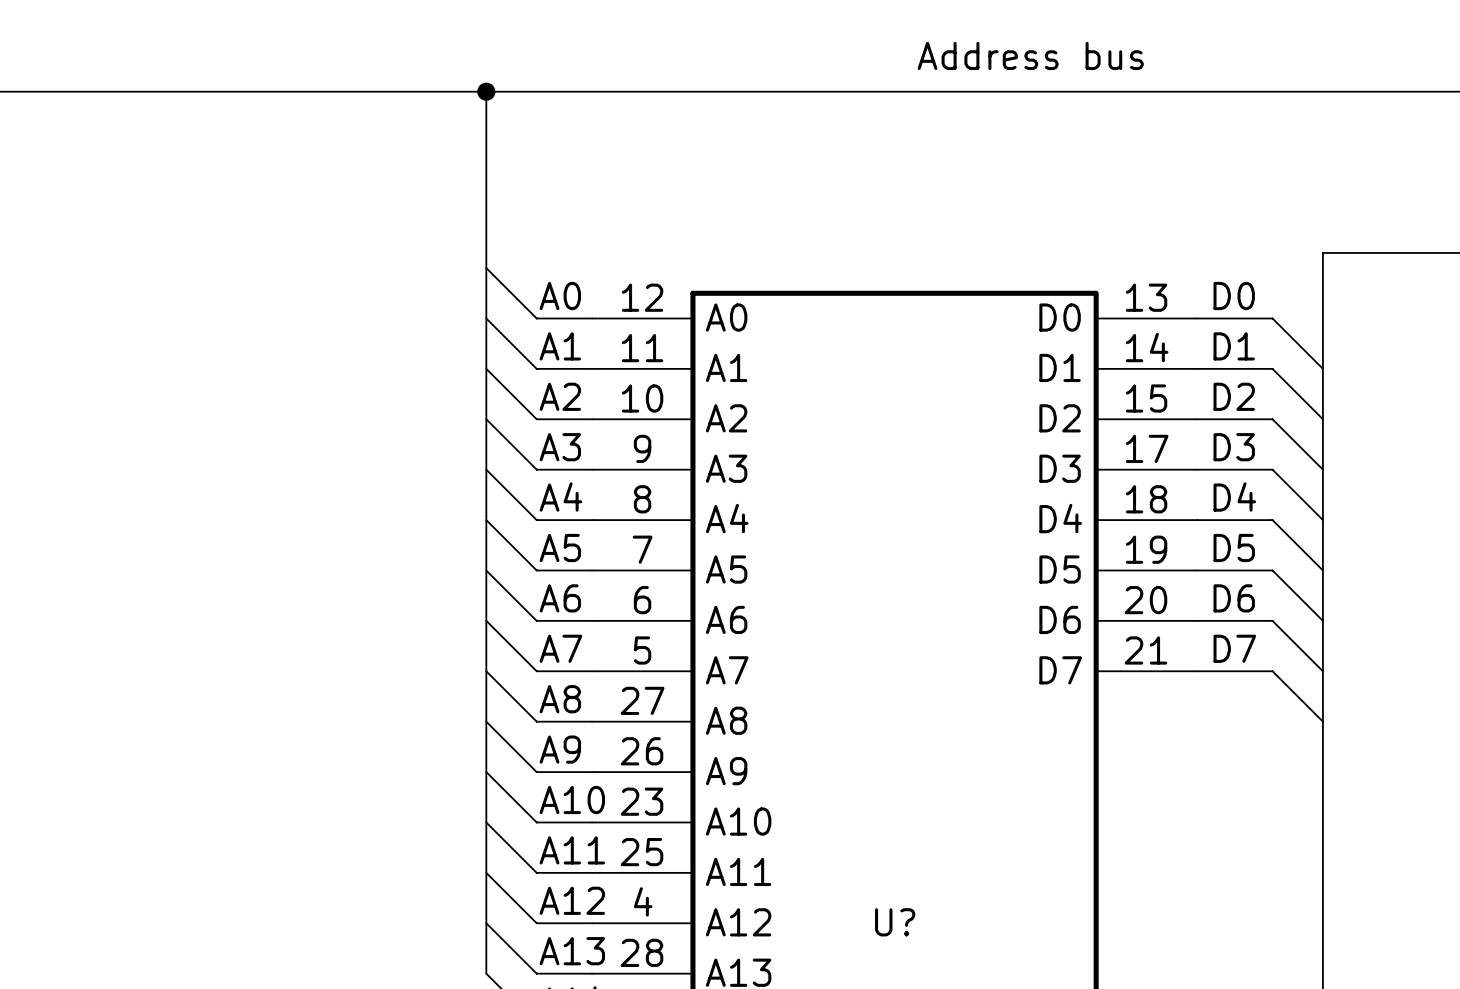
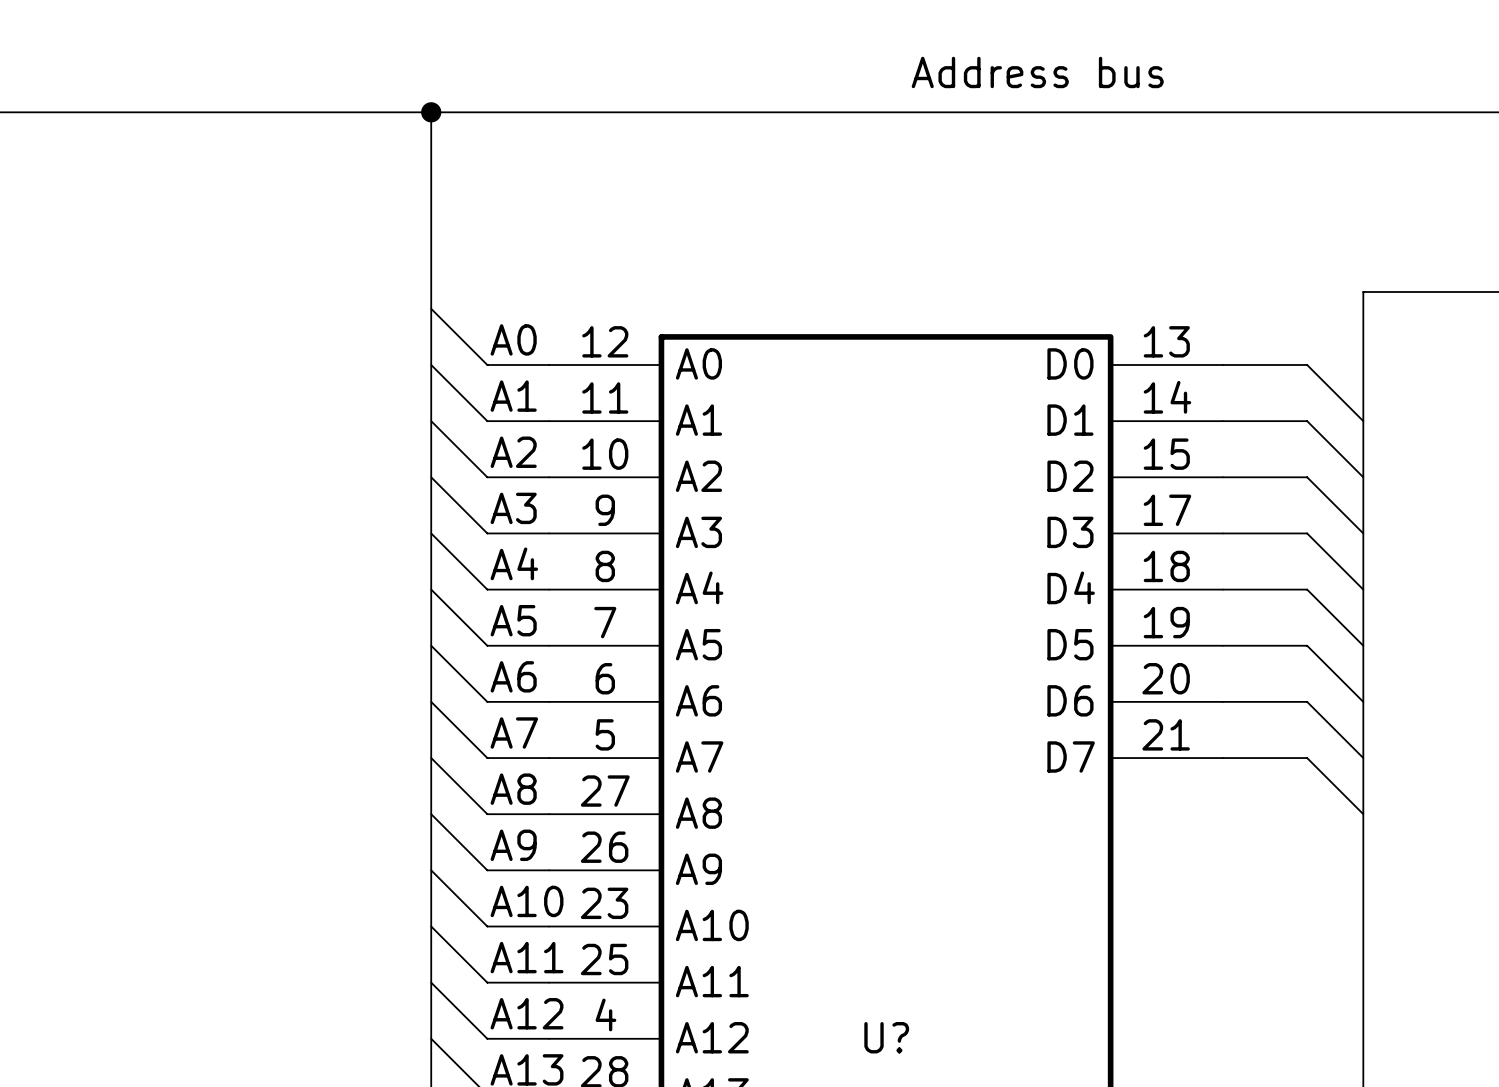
label: D0 (1234, 296) -> none
label: D1 (1234, 346) -> none
label: D2 (1234, 396) -> none
label: D3 (1234, 447) -> none
label: D4 (1234, 497) -> none
label: D5 (1234, 548) -> none
label: D6 (1234, 598) -> none
label: D7 (1234, 648) -> none

